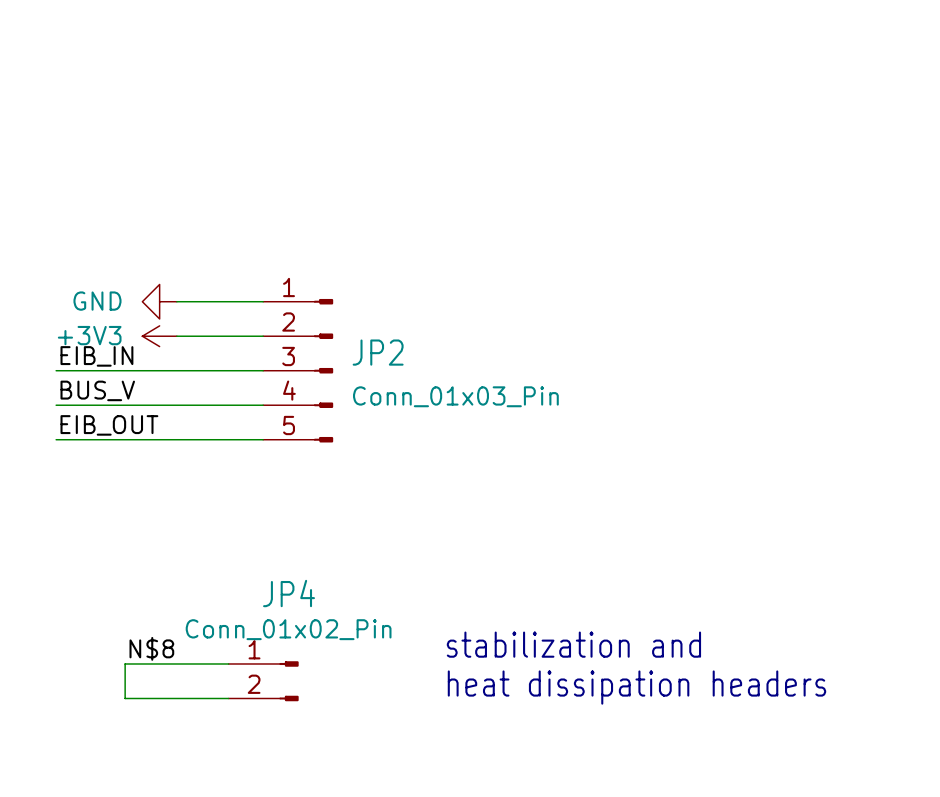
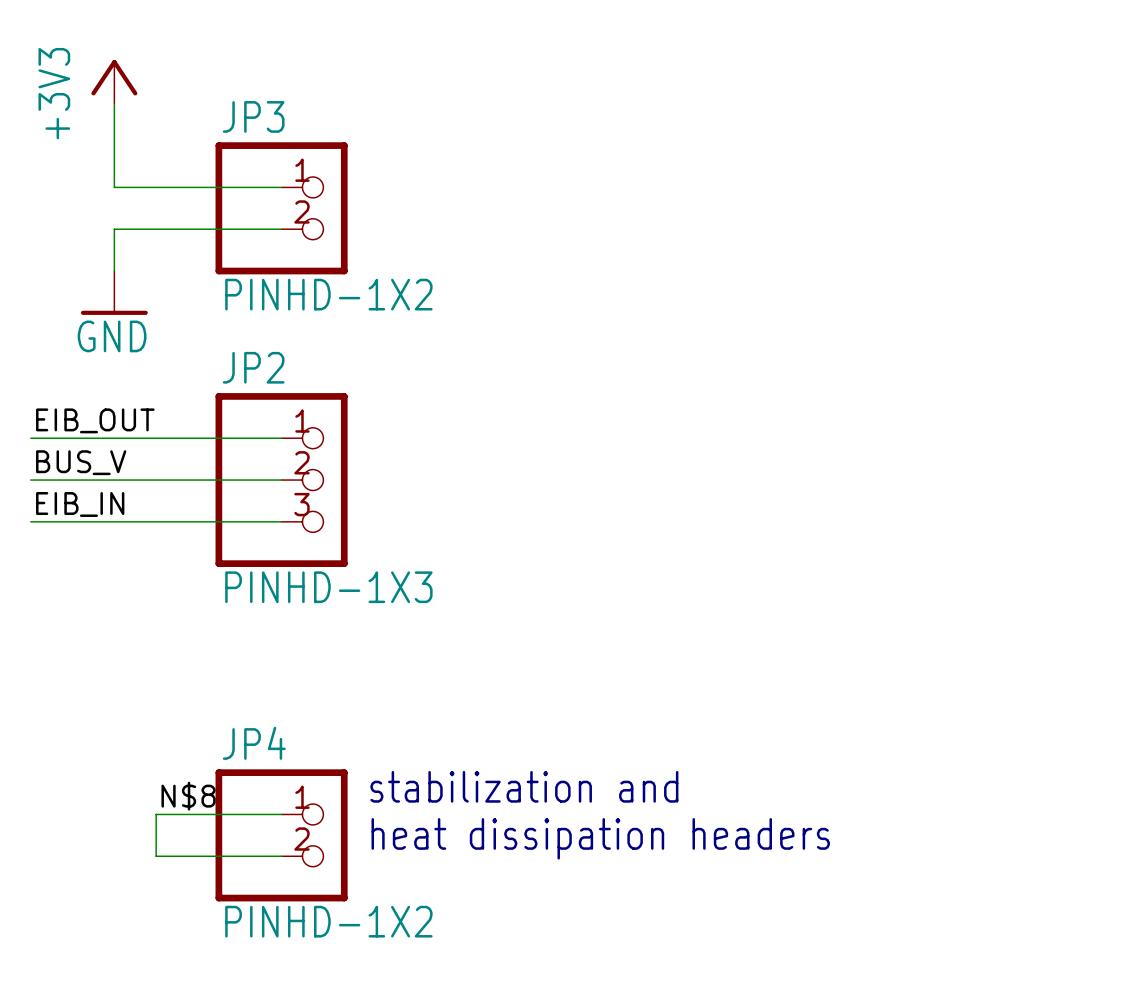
power symbol: none -> +3V3 (114, 81)
wire: none -> (114, 103) (114, 187) (281, 187)
JP3: none -> PINHD-1X2 (281, 208)
wire: none -> (281, 229) (114, 229) (114, 271)
power symbol: none -> GND (114, 292)
JP2 symbol: [263, 298, 334, 443] -> [215, 393, 348, 567]
power symbol: GND (159, 301) -> none
wire: (176, 301) (263, 301) -> none
power symbol: +3V3 (159, 336) -> none
wire: (176, 336) (263, 336) -> none
JP2 name position: JP2 (378, 352) -> JP2 (253, 367)
label position: EIB_IN (96, 356) -> EIB_IN (80, 504)
wire: (56, 370) (263, 370) -> (30, 438) (281, 438)
label position: BUS_V (97, 390) -> BUS_V (81, 462)
JP2 value: Conn_01x03_Pin (455, 396) -> PINHD-1X3 (328, 587)
wire: (56, 405) (263, 405) -> (30, 480) (281, 480)
label position: EIB_OUT (109, 425) -> EIB_OUT (95, 420)
wire: (56, 439) (263, 439) -> (30, 521) (281, 521)
JP4 name position: JP4 (289, 593) -> JP4 (254, 743)
JP4 value: Conn_01x02_Pin (288, 629) -> PINHD-1X2 (328, 921)
text position: stabilization and (573, 644) -> stabilization and (524, 786)
JP4 symbol: [228, 661, 299, 702] -> [215, 769, 348, 902]
text position: heat dissipation headers (636, 687) -> heat dissipation headers (600, 838)

